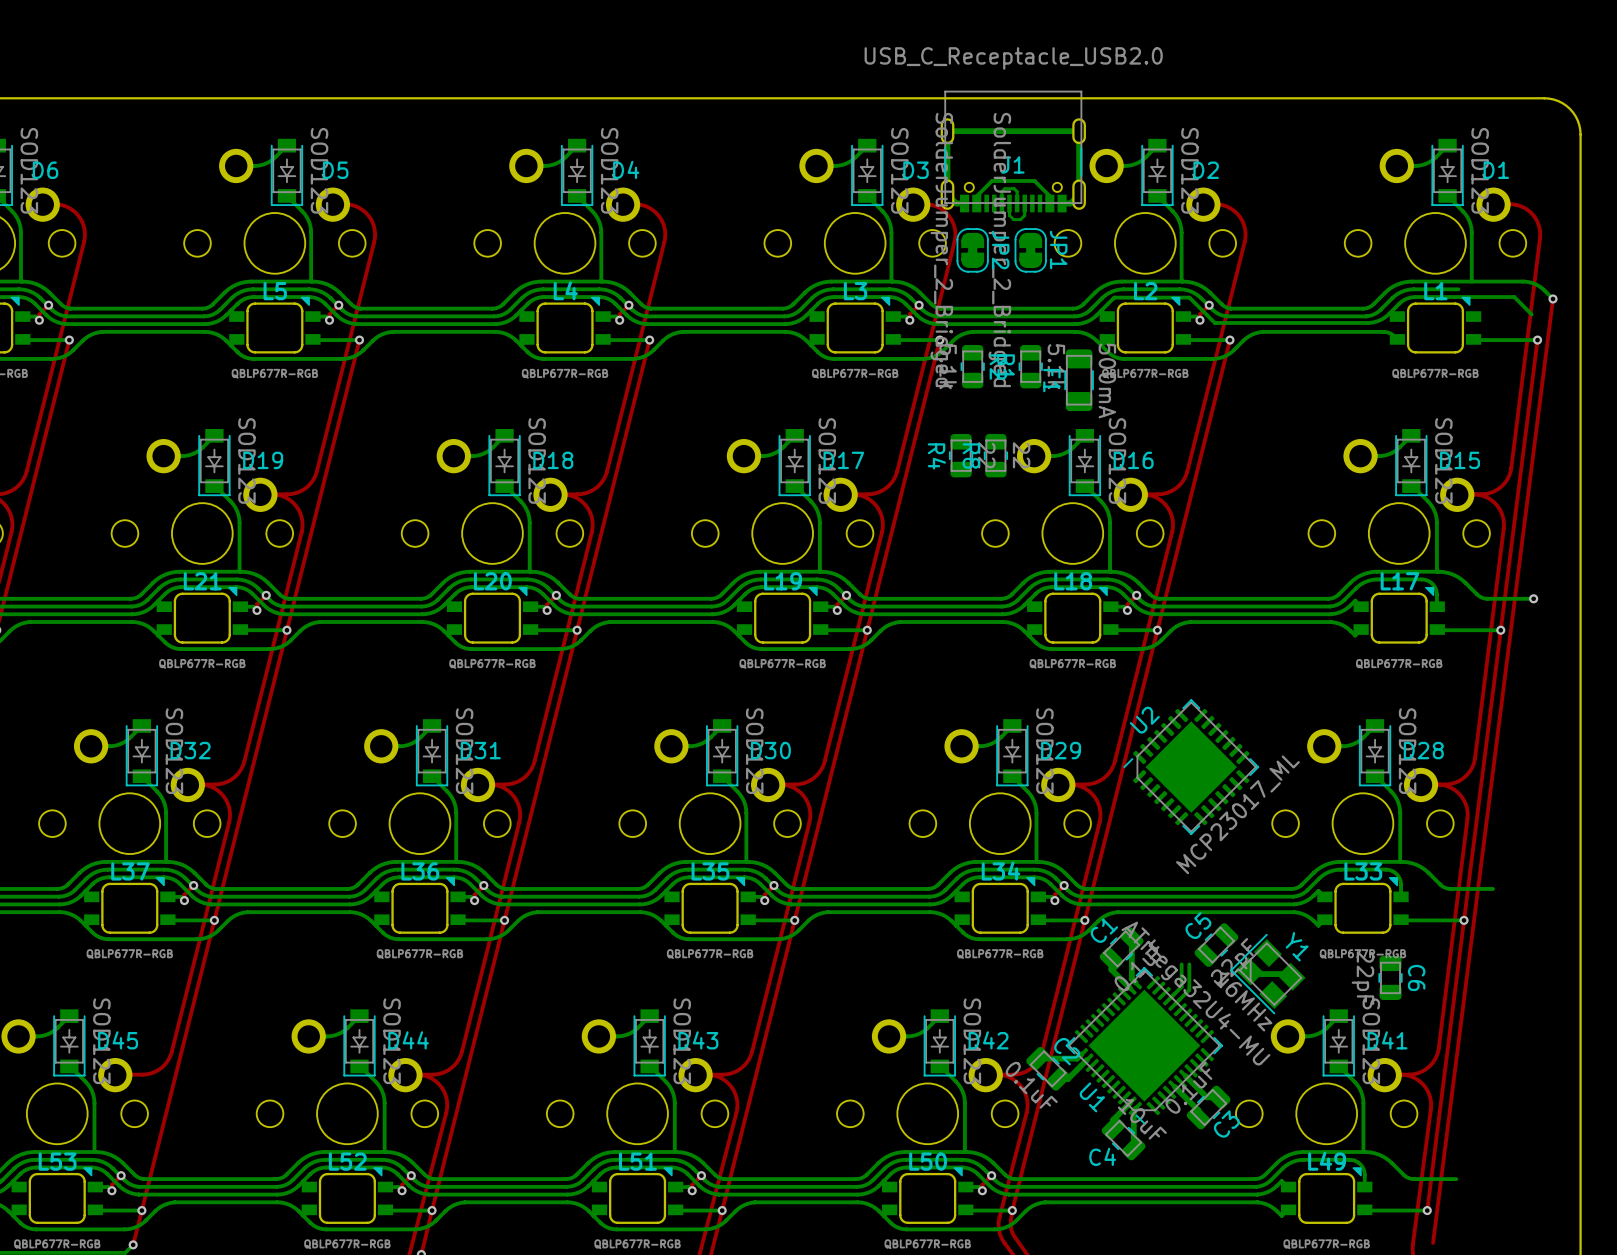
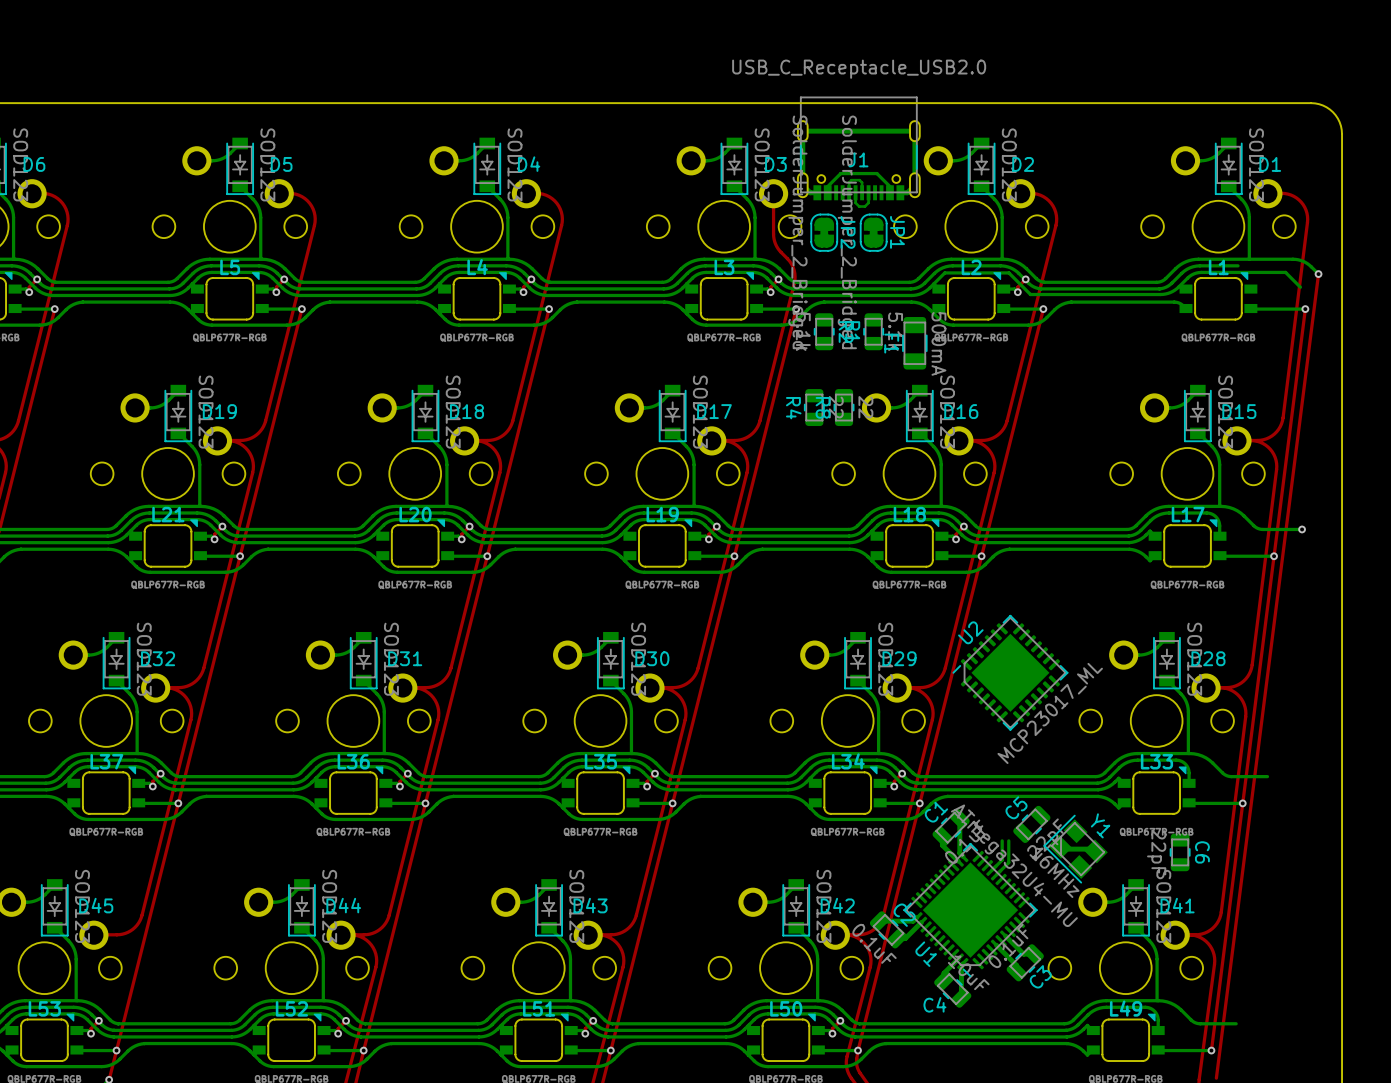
top track: (913, 204) (928, 204) (940, 208) (948, 215) (954, 226) (954, 242) (937, 309) -> (773, 193) (774, 239) (777, 248) (793, 267) (794, 283)

